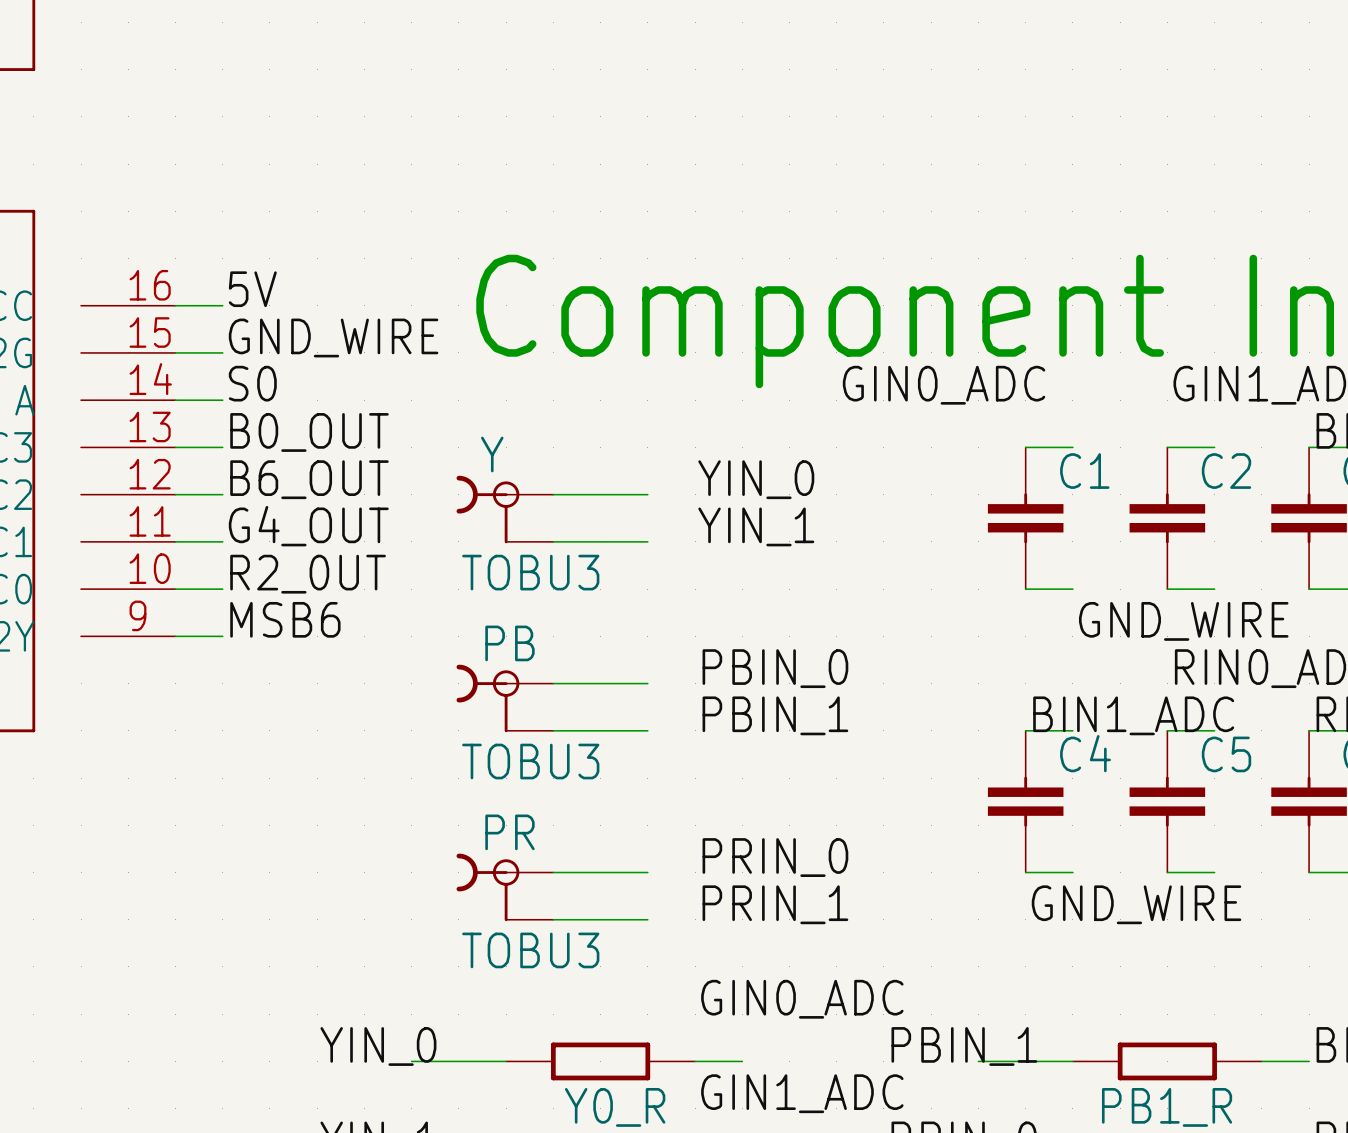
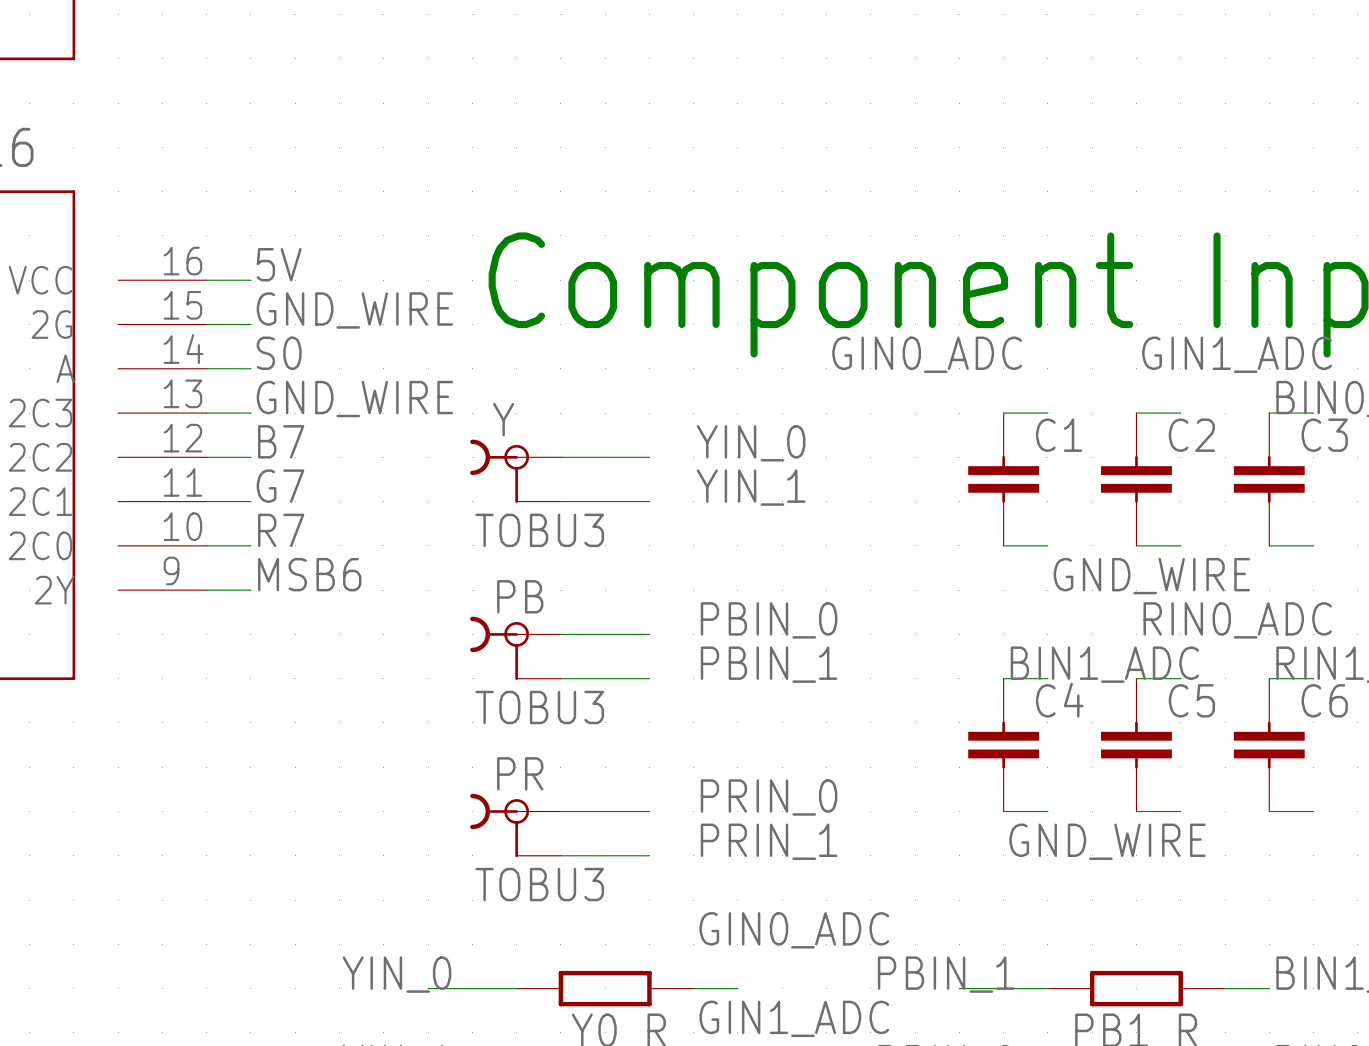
label: B0_OUT (309, 432) -> GND_WIRE (354, 399)
label: B6_OUT (309, 479) -> B7 (281, 441)
label: G4_OUT (308, 526) -> G7 (280, 486)
label: R2_0UT (308, 574) -> R7 (281, 530)

